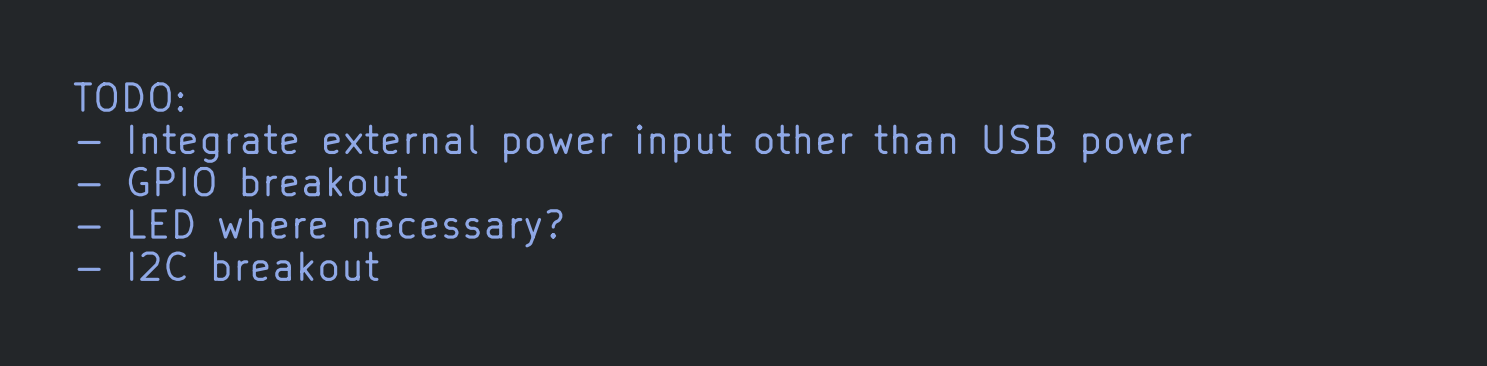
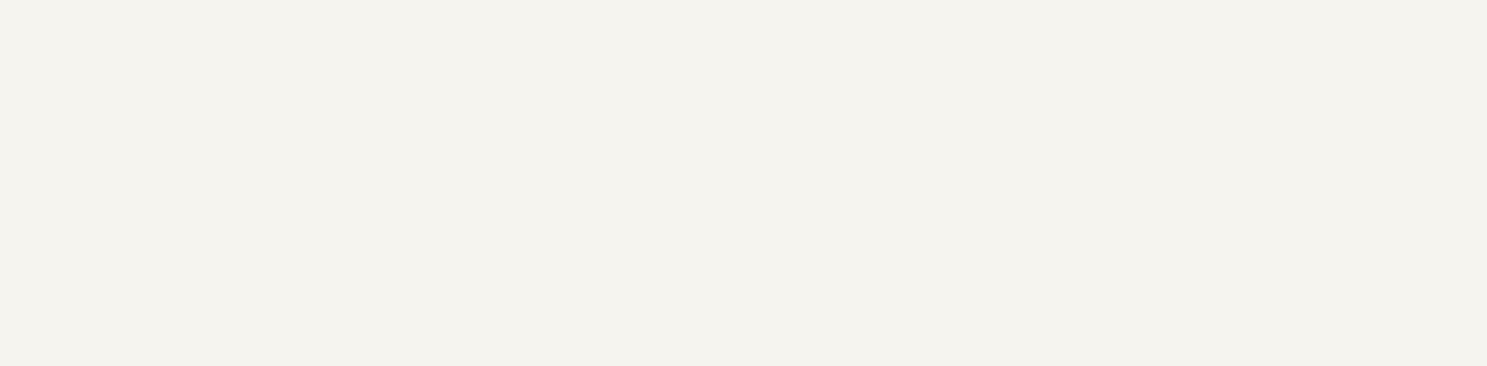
text: TODO: (128, 97) -> none
text: - Integrate external power input other than USB power (634, 143) -> none
text: - GPIO breakout (242, 181) -> none
text: - LED where necessary? (319, 228) -> none
text: - I2C breakout (228, 266) -> none

